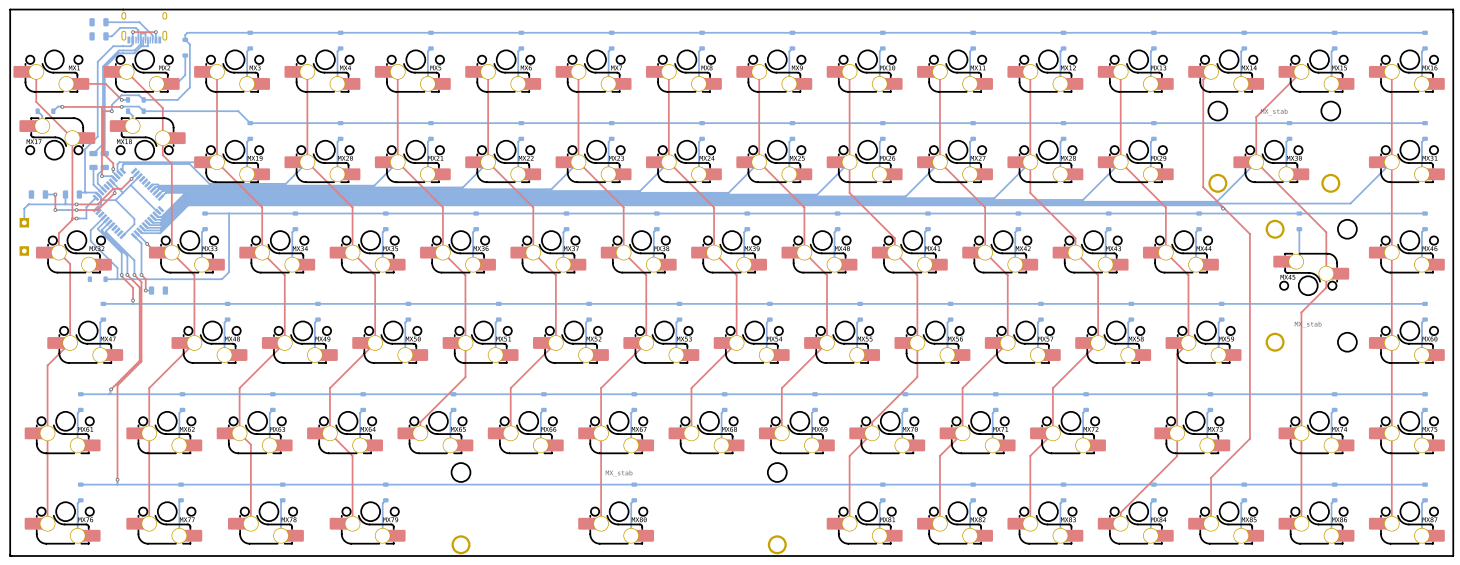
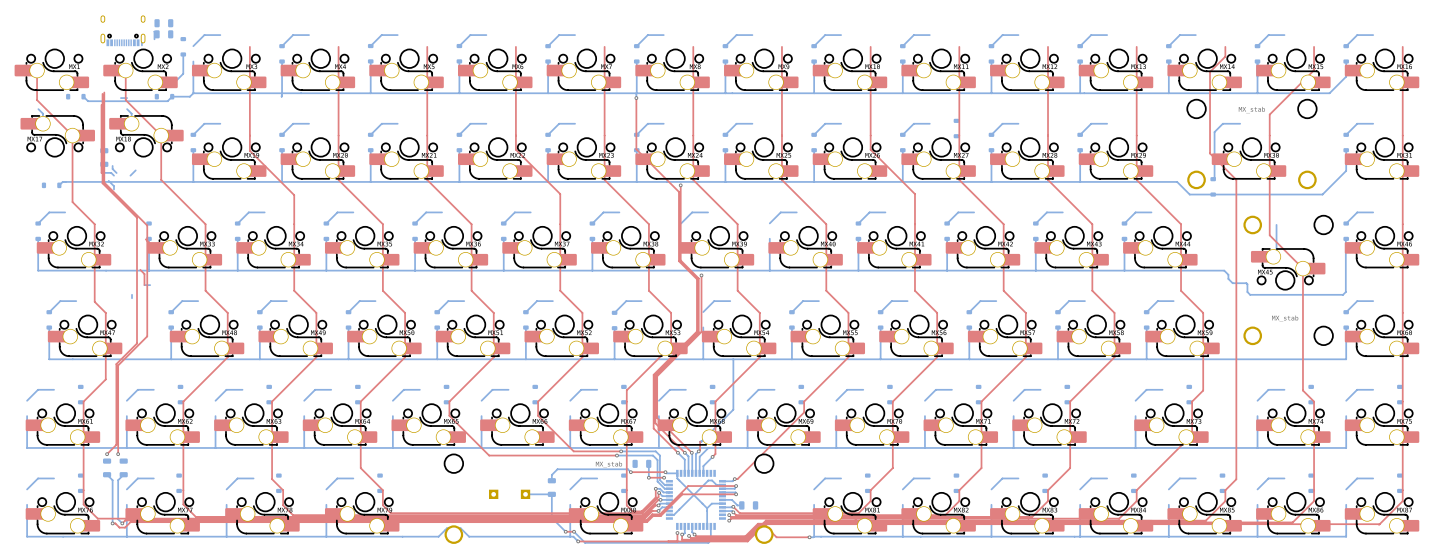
board edge: (10, 9) (1453, 9) (1453, 555) (10, 555) (10, 9) -> none
part: (99, 22) -> none
bottom track: (105, 22) (139, 22) (152, 35) (152, 40) -> none
part: none -> (163, 23)
part: (144, 27) -> none
part: none -> (122, 30)
bottom track: (132, 32) (132, 44) (130, 46) (113, 46) (97, 61) (97, 136) (85, 149) (85, 192) -> none
top track: (133, 32) (155, 32) -> none
via: (133, 32) -> none
via: (155, 32) -> none
bottom track: (1425, 32) (187, 32) (185, 39) (189, 44) (189, 87) (177, 99) (143, 99) (139, 95) (121, 95) (111, 104) (111, 111) -> none
part: none -> (163, 34)
bottom track: none -> (220, 35) (204, 35) (193, 46)
bottom track: none -> (309, 35) (293, 35) (282, 46)
bottom track: none -> (397, 35) (381, 35) (370, 46)
bottom track: none -> (486, 35) (470, 35) (459, 46)
bottom track: none -> (575, 35) (559, 35) (548, 46)
bottom track: none -> (663, 35) (647, 35) (636, 46)
bottom track: none -> (752, 35) (736, 35) (725, 46)
bottom track: none -> (841, 35) (825, 35) (814, 46)
bottom track: none -> (929, 35) (913, 35) (902, 46)
bottom track: none -> (1018, 35) (1002, 35) (991, 46)
bottom track: none -> (1107, 35) (1091, 35) (1080, 46)
bottom track: none -> (1195, 35) (1179, 35) (1168, 46)
bottom track: none -> (1284, 35) (1268, 35) (1257, 46)
bottom track: none -> (1373, 35) (1357, 35) (1346, 46)
part: (99, 36) -> none
bottom track: (105, 36) (111, 36) (120, 27) (135, 27) (138, 30) (138, 40) -> none
bottom track: (145, 40) (145, 33) (140, 33) (140, 44) (134, 50) (119, 50) (103, 66) (103, 144) (93, 153) -> none
bottom track: (147, 40) (147, 46) (141, 46) (134, 53) (118, 53) (104, 67) (104, 153) -> none
part: (250, 40) -> none
part: (340, 40) -> none
part: (430, 40) -> none
part: (521, 40) -> none
part: (611, 40) -> none
part: (702, 40) -> none
part: (792, 40) -> none
part: (882, 40) -> none
part: (973, 40) -> none
part: (1063, 40) -> none
part: (1153, 40) -> none
part: (1244, 40) -> none
part: (1334, 40) -> none
part: (1425, 40) -> none
top track: none -> (249, 46) (249, 150) (294, 195) (294, 290) (316, 312) (316, 357) (272, 401) (272, 479) (283, 490) (283, 505) (292, 515) (643, 515) (660, 499)
top track: none -> (338, 46) (338, 179) (382, 224) (382, 290) (405, 312) (405, 357) (360, 401) (360, 468) (382, 490) (382, 505) (390, 513) (642, 513) (658, 497) (659, 492)
top track: none -> (427, 46) (427, 179) (471, 224) (471, 290) (493, 312) (493, 357) (449, 401) (449, 415) (489, 455) (616, 455)
top track: none -> (515, 46) (515, 149) (560, 194) (560, 290) (582, 312) (582, 357) (538, 401) (538, 415) (573, 451) (621, 451)
top track: none -> (604, 46) (604, 179) (648, 224) (648, 290) (671, 312) (671, 345) (626, 390) (626, 505) (632, 511) (641, 511) (655, 497) (655, 488)
top track: none -> (693, 46) (693, 179) (737, 224) (737, 290) (759, 312) (759, 357) (715, 401) (715, 454) (712, 456)
top track: none -> (781, 46) (781, 179) (826, 224) (826, 290) (848, 312) (848, 357) (804, 401) (804, 412) (737, 479) (734, 479)
top track: none -> (870, 46) (870, 149) (914, 194) (914, 290) (937, 312) (937, 357) (892, 401) (892, 468) (870, 490) (870, 501) (858, 513) (739, 513) (733, 506)
top track: none -> (959, 46) (959, 179) (1003, 224) (1003, 290) (1025, 312) (1025, 357) (981, 401) (981, 468) (959, 490) (959, 501) (945, 515) (736, 515) (733, 512)
top track: none -> (1048, 46) (1048, 179) (1092, 224) (1092, 290) (1114, 312) (1114, 357) (1070, 401) (1070, 468) (1048, 490) (1048, 501) (1032, 516) (730, 516) (729, 515)
top track: none -> (1136, 46) (1136, 179) (1181, 224) (1181, 290) (1203, 312) (1203, 390) (1192, 401) (1192, 434) (1136, 490) (1136, 501) (1119, 518) (731, 518) (729, 520)
top track: none -> (1225, 46) (1225, 56) (1210, 71) (1210, 153) (1236, 179) (1236, 479) (1225, 490) (1225, 501) (1205, 520) (765, 520) (762, 523) (757, 523) (745, 536) (696, 536) (694, 534)
top track: none -> (1402, 46) (1402, 501) (1379, 524)
bottom track: (250, 48) (247, 51) (247, 83) (250, 80) -> none
bottom track: (340, 48) (337, 51) (337, 83) (340, 80) -> none
bottom track: (430, 48) (427, 51) (427, 83) -> none
bottom track: (521, 48) (518, 51) (518, 83) (521, 80) -> none
bottom track: (611, 48) (608, 51) (608, 83) (611, 80) -> none
bottom track: (702, 48) (698, 51) (698, 83) (702, 80) -> none
bottom track: (792, 48) (789, 51) (789, 83) (792, 80) -> none
bottom track: (882, 48) (879, 51) (879, 83) (882, 80) -> none
bottom track: (973, 48) (970, 51) (970, 83) (973, 80) -> none
bottom track: (1063, 48) (1060, 51) (1060, 83) (1063, 80) -> none
bottom track: (1153, 48) (1150, 51) (1150, 83) (1153, 80) -> none
bottom track: (1244, 48) (1241, 51) (1241, 83) (1244, 80) -> none
bottom track: (1334, 48) (1331, 51) (1331, 83) (1334, 80) -> none
bottom track: (1425, 48) (1421, 51) (1421, 83) -> none
part: none -> (282, 53)
part: none -> (370, 53)
part: none -> (459, 53)
part: none -> (548, 53)
part: none -> (636, 53)
part: none -> (725, 53)
part: none -> (814, 53)
part: none -> (902, 53)
part: none -> (991, 53)
part: none -> (1080, 53)
part: none -> (1168, 53)
part: none -> (1257, 53)
part: none -> (1346, 53)
bottom track: none -> (193, 61) (193, 93)
bottom track: none -> (282, 61) (282, 96)
bottom track: none -> (370, 61) (370, 93)
bottom track: none -> (459, 61) (459, 93)
bottom track: none -> (548, 61) (548, 93)
bottom track: none -> (636, 61) (636, 98)
bottom track: none -> (725, 61) (725, 93)
bottom track: none -> (814, 61) (814, 93)
bottom track: none -> (902, 61) (902, 93)
bottom track: none -> (991, 61) (991, 93)
bottom track: none -> (1080, 61) (1080, 93)
bottom track: none -> (1168, 61) (1168, 93)
bottom track: none -> (1257, 61) (1257, 93)
bottom track: none -> (1346, 61) (1346, 76) (1329, 93) (193, 93)
top track: (126, 71) (162, 108) (162, 138) -> (125, 70) (125, 100) (161, 135)
top track: (217, 71) (217, 162) (262, 207) (262, 252) (284, 275) (284, 342) (239, 388) (239, 433) (250, 444) (250, 523) -> none
top track: (307, 71) (307, 162) (352, 207) (352, 252) (375, 275) (375, 342) (329, 388) (329, 433) (352, 455) (352, 523) -> none
top track: (397, 71) (397, 162) (442, 207) (442, 252) (465, 275) (465, 377) (420, 422) (420, 433) -> none
top track: (488, 71) (488, 162) (533, 207) (533, 252) (555, 275) (555, 342) (510, 388) (510, 433) -> none
top track: (578, 71) (578, 162) (623, 207) (623, 252) (646, 275) (646, 342) (601, 388) (601, 523) -> none
top track: (668, 71) (668, 162) (714, 207) (714, 252) (736, 275) (736, 342) (691, 388) (691, 433) -> none
top track: (759, 71) (759, 162) (804, 207) (804, 252) (827, 275) (827, 342) (781, 388) (781, 433) -> none
top track: (849, 71) (849, 192) (894, 238) (894, 252) (917, 275) (917, 377) (872, 422) (872, 433) (849, 455) (849, 523) -> none
top track: (939, 71) (939, 162) (985, 207) (985, 252) (1007, 275) (1007, 342) (962, 388) (962, 433) (939, 455) (939, 523) -> none
top track: (1030, 71) (1030, 192) (1075, 238) (1075, 252) (1098, 275) (1098, 342) (1052, 388) (1052, 433) (1030, 455) (1030, 523) -> none
top track: (1120, 71) (1120, 162) (1165, 207) (1165, 252) (1188, 275) (1188, 342) (1177, 354) (1177, 456) (1120, 512) (1120, 523) -> none
top track: (1211, 71) (1203, 79) (1203, 187) (1249, 234) (1249, 438) (1211, 477) (1211, 523) -> none
top track: (1301, 71) (1256, 117) (1256, 162) (1326, 232) (1326, 273) -> (1314, 46) (1314, 70) (1269, 114) (1269, 235) (1302, 268)
top track: (1391, 71) (1391, 523) -> none
top track: (66, 83) (105, 83) (121, 99) -> none
top track: none -> (104, 92) (104, 182) (147, 225) (147, 336) (118, 365) (118, 454)
top track: none -> (102, 93) (102, 183) (137, 217) (137, 343) (116, 364) (116, 444) (107, 454)
bottom track: none -> (193, 93) (189, 96) (172, 96) (167, 101) (88, 101) (83, 96)
part: none -> (75, 96)
part: none -> (164, 96)
via: (121, 99) -> none
part: (135, 99) -> none
top track: none -> (636, 98) (636, 149) (678, 191) (678, 261) (696, 279) (696, 331) (653, 374) (653, 428) (677, 452)
via: none -> (636, 98)
bottom track: (60, 106) (62, 106) (57, 106) (53, 111) -> none
top track: (62, 106) (121, 106) -> none
via: (62, 106) -> none
via: (121, 106) -> none
bottom track: (123, 106) (139, 106) (143, 111) (238, 111) (250, 123) (1425, 123) -> none
part: (45, 111) -> none
top track: (111, 111) (103, 111) (103, 153) (113, 163) (113, 169) -> none
via: (111, 111) -> none
part: (135, 111) -> none
bottom track: none -> (220, 123) (204, 123) (193, 134)
bottom track: none -> (309, 123) (293, 123) (282, 134)
bottom track: none -> (397, 123) (381, 123) (370, 134)
bottom track: none -> (486, 123) (470, 123) (459, 134)
bottom track: none -> (575, 123) (559, 123) (548, 134)
bottom track: none -> (663, 123) (647, 123) (636, 134)
bottom track: none -> (752, 123) (736, 123) (725, 134)
bottom track: none -> (841, 123) (825, 123) (814, 134)
bottom track: none -> (929, 123) (913, 123) (902, 134)
bottom track: none -> (1018, 123) (1002, 123) (991, 134)
bottom track: none -> (1107, 123) (1091, 123) (1080, 134)
bottom track: none -> (1240, 123) (1222, 123) (1214, 132) (1213, 179)
bottom track: none -> (1373, 123) (1357, 123) (1346, 134)
part: (250, 130) -> none
part: (340, 130) -> none
part: (430, 130) -> none
part: (521, 130) -> none
part: (611, 130) -> none
part: (702, 130) -> none
part: (792, 130) -> none
part: (882, 130) -> none
part: (1063, 130) -> none
part: (1153, 130) -> none
part: (1289, 130) -> none
part: (1425, 130) -> none
bottom track: (250, 138) (247, 141) (247, 174) (250, 171) -> none
bottom track: (340, 138) (337, 141) (337, 174) (340, 171) -> none
bottom track: (430, 138) (427, 141) (427, 174) (430, 171) -> none
bottom track: (521, 138) (518, 141) (518, 174) (521, 171) -> none
bottom track: (611, 138) (608, 141) (608, 174) (611, 171) -> none
bottom track: (702, 138) (698, 141) (698, 174) (702, 171) -> none
bottom track: (792, 138) (789, 141) (789, 174) (792, 171) -> none
bottom track: (882, 138) (879, 141) (879, 174) (882, 171) -> none
bottom track: (973, 138) (970, 141) (970, 174) (973, 171) -> none
bottom track: (1063, 138) (1060, 141) (1060, 174) (1063, 171) -> none
bottom track: (1153, 138) (1150, 141) (1150, 174) (1153, 171) -> none
bottom track: (1289, 138) (1286, 141) (1286, 174) -> none
bottom track: (1425, 138) (1421, 141) (1421, 174) (1425, 171) -> none
part: none -> (193, 142)
part: none -> (282, 142)
part: none -> (370, 142)
part: none -> (459, 142)
part: none -> (548, 142)
part: none -> (636, 142)
part: none -> (725, 142)
part: none -> (814, 142)
part: none -> (902, 142)
part: none -> (991, 142)
part: none -> (1080, 142)
part: none -> (1346, 142)
bottom track: none -> (193, 150) (193, 181)
bottom track: none -> (282, 150) (282, 181)
bottom track: none -> (370, 150) (370, 181)
bottom track: none -> (459, 150) (459, 181)
bottom track: none -> (548, 150) (548, 181)
bottom track: none -> (636, 150) (636, 181)
bottom track: none -> (725, 150) (725, 181)
bottom track: none -> (814, 150) (814, 181)
bottom track: none -> (902, 150) (902, 181)
bottom track: none -> (991, 150) (991, 181)
bottom track: none -> (1080, 150) (1080, 181)
bottom track: none -> (1346, 150) (1346, 170) (1322, 194) (1189, 194) (1177, 181) (62, 181) (59, 185)
top track: (162, 155) (171, 164) (171, 252) (194, 275) (194, 342) (149, 388) (149, 523) -> (161, 152) (161, 179) (205, 224) (205, 290) (227, 312) (227, 357) (183, 401) (183, 504) (195, 516) (644, 516) (655, 505) (658, 505)
part: (93, 160) -> none
bottom track: (217, 162) (119, 162) (117, 171) (120, 173) -> none
bottom track: (307, 162) (285, 183) (209, 183) (189, 164) (123, 164) (122, 170) -> none
bottom track: (397, 162) (374, 185) (152, 184) (150, 187) -> none
bottom track: (488, 162) (462, 187) (155, 187) (152, 189) -> none
bottom track: (578, 162) (551, 189) (158, 189) (155, 192) -> none
bottom track: (668, 162) (640, 191) (162, 191) (158, 195) -> none
bottom track: (759, 162) (728, 192) (165, 192) (160, 197) -> none
bottom track: (849, 162) (817, 194) (183, 194) (161, 217) (155, 214) -> none
bottom track: (939, 162) (905, 196) (184, 196) (161, 219) (155, 219) (152, 217) -> none
bottom track: (1030, 162) (994, 198) (185, 198) (160, 222) (153, 222) (150, 219) -> none
bottom track: (1120, 162) (1082, 199) (185, 199) (160, 225) (150, 225) (147, 222) -> none
bottom track: (1256, 162) (1216, 201) (186, 201) (160, 227) (147, 227) (144, 225) -> none
bottom track: (1391, 162) (1350, 203) (187, 203) (160, 230) (144, 230) (142, 227) -> none
bottom track: (93, 167) (93, 184) (101, 192) -> none
bottom track: (104, 167) (97, 174) (97, 183) (103, 189) -> none
via: (113, 169) -> none
via: (101, 176) -> none
bottom track: (139, 176) (115, 200) -> none
top track: (131, 178) (121, 188) (113, 188) (97, 204) (76, 204) -> none
via: (131, 178) -> none
bottom track: (111, 181) (122, 192) -> none
bottom track: (130, 185) (158, 211) -> none
part: none -> (51, 185)
top track: none -> (680, 185) (680, 260) (698, 278) (698, 332) (655, 375) (655, 423) (684, 452)
via: none -> (680, 185)
part: none -> (1213, 186)
top track: (114, 193) (97, 210) (76, 210) -> none
via: (114, 193) -> none
part: (38, 194) -> none
bottom track: (45, 194) (55, 194) -> none
top track: (55, 194) (55, 210) -> none
via: (55, 194) -> none
bottom track: (65, 194) (65, 204) -> none
part: (72, 194) -> none
bottom track: (79, 194) (81, 192) (96, 192) (101, 197) (101, 203) (95, 209) -> none
bottom track: (95, 197) (86, 207) (86, 218) (76, 218) -> none
bottom track: (101, 200) (115, 200) -> none
bottom track: (115, 200) (134, 218) (134, 224) (122, 236) -> none
part: (128, 203) -> none
bottom track: (28, 204) (24, 208) (24, 222) -> none
bottom track: (28, 204) (76, 204) -> none
via: (76, 204) -> none
top track: (72, 205) (72, 219) (58, 233) (58, 252) (70, 263) (70, 342) (47, 365) (47, 523) -> (72, 202) (94, 224) (94, 301) (105, 312) (105, 379) (83, 401) (83, 504) (97, 518) (644, 518) (652, 510) (658, 510)
bottom track: (1223, 208) (1219, 205) (188, 205) (160, 233) (142, 233) (139, 230) -> none
via: (1223, 208) -> none
bottom track: (55, 210) (76, 210) -> none
via: (55, 210) -> none
via: (76, 210) -> none
bottom track: (205, 213) (1425, 213) -> none
bottom track: (229, 213) (229, 272) (221, 279) (105, 279) -> none
bottom track: none -> (65, 212) (49, 212) (38, 223)
bottom track: none -> (264, 212) (248, 212) (237, 223)
bottom track: none -> (353, 212) (337, 212) (326, 223)
bottom track: none -> (442, 212) (426, 212) (415, 223)
bottom track: none -> (530, 212) (514, 212) (503, 223)
bottom track: none -> (619, 212) (603, 212) (592, 223)
bottom track: none -> (708, 212) (692, 212) (681, 223)
bottom track: none -> (796, 212) (780, 212) (769, 223)
bottom track: none -> (885, 212) (869, 212) (858, 223)
bottom track: none -> (974, 212) (958, 212) (947, 223)
bottom track: none -> (1062, 212) (1046, 212) (1035, 223)
bottom track: none -> (1151, 212) (1135, 212) (1124, 223)
bottom track: none -> (1373, 212) (1357, 212) (1346, 223)
bottom track: (103, 217) (90, 230) (90, 241) (117, 267) (117, 279) -> none
top track: (72, 218) (76, 218) -> none
via: (76, 218) -> none
bottom track: (106, 219) (97, 228) -> none
part: (205, 221) -> none
part: (295, 221) -> none
part: (385, 221) -> none
part: (476, 221) -> none
part: (566, 221) -> none
part: (656, 221) -> none
part: (747, 221) -> none
part: (837, 221) -> none
part: (928, 221) -> none
part: (1018, 221) -> none
part: (1108, 221) -> none
part: (1199, 221) -> none
part: (1299, 221) -> none
part: (1425, 221) -> none
part: (24, 222) -> none
bottom track: (109, 222) (101, 230) (127, 255) (127, 275) -> none
bottom track: (111, 225) (106, 232) (134, 260) (134, 275) -> none
bottom track: (97, 228) (121, 252) (121, 275) -> none
bottom track: (205, 229) (201, 232) (201, 264) -> none
bottom track: (295, 229) (292, 232) (292, 264) -> none
bottom track: (385, 229) (382, 232) (382, 264) -> none
bottom track: (476, 229) (473, 232) (473, 264) -> none
bottom track: (566, 229) (563, 232) (563, 264) -> none
bottom track: (656, 229) (653, 232) (653, 264) -> none
bottom track: (747, 229) (744, 232) (744, 264) -> none
bottom track: (837, 229) (834, 232) (834, 264) -> none
bottom track: (928, 229) (924, 232) (924, 264) -> none
bottom track: (1018, 229) (1015, 232) (1015, 264) -> none
bottom track: (1108, 229) (1105, 232) (1105, 264) -> none
bottom track: (1199, 229) (1196, 232) (1196, 264) -> none
bottom track: (1425, 229) (1421, 232) (1421, 264) -> none
bottom track: (136, 233) (147, 243) -> none
part: none -> (38, 231)
part: none -> (149, 231)
part: none -> (237, 231)
part: none -> (326, 231)
part: none -> (415, 231)
part: none -> (503, 231)
part: none -> (592, 231)
part: none -> (858, 231)
part: none -> (947, 231)
part: none -> (1035, 231)
part: none -> (1124, 231)
part: none -> (1346, 231)
bottom track: (134, 236) (141, 243) (141, 275) -> none
bottom track: none -> (38, 238) (38, 270) (1224, 270) (1232, 283) (1246, 283) (1247, 292) (1250, 294) (1343, 294) (1345, 292) (1346, 238)
via: (147, 243) -> none
bottom track: none -> (149, 238) (149, 270)
bottom track: none -> (237, 238) (237, 270)
bottom track: none -> (326, 238) (326, 270)
bottom track: none -> (415, 238) (415, 270)
bottom track: none -> (503, 238) (503, 270)
bottom track: none -> (592, 238) (592, 270)
bottom track: none -> (769, 238) (769, 270)
bottom track: none -> (858, 238) (858, 270)
bottom track: none -> (947, 238) (947, 270)
bottom track: none -> (1035, 238) (1035, 270)
bottom track: none -> (1124, 238) (1124, 270)
part: (24, 250) -> none
top track: (121, 275) (133, 287) (133, 300) -> none
via: (121, 275) -> none
top track: (127, 275) (139, 287) (139, 360) (111, 389) -> none
via: (127, 275) -> none
top track: (134, 275) (141, 282) (141, 361) (117, 385) (117, 479) -> none
via: (134, 275) -> none
via: (141, 275) -> none
part: (97, 279) -> none
top track: none -> (701, 275) (701, 331) (657, 376) (657, 418) (691, 452)
via: none -> (701, 275)
top track: (1326, 287) (1301, 312) (1301, 523) -> (1302, 282) (1302, 390) (1314, 401) (1314, 501) (1292, 522) (766, 522) (763, 525) (758, 525) (746, 537) (691, 537) (689, 535)
via: (145, 290) -> none
part: (158, 290) -> none
via: (133, 300) -> none
bottom track: (103, 303) (1425, 303) -> none
bottom track: none -> (76, 301) (60, 301) (49, 312)
bottom track: none -> (198, 301) (182, 301) (171, 312)
bottom track: none -> (286, 301) (270, 301) (259, 312)
bottom track: none -> (375, 301) (359, 301) (348, 312)
bottom track: none -> (464, 301) (448, 301) (437, 312)
bottom track: none -> (552, 301) (536, 301) (525, 312)
bottom track: none -> (641, 301) (626, 301) (614, 312)
bottom track: none -> (730, 301) (714, 301) (703, 312)
bottom track: none -> (818, 301) (803, 301) (791, 312)
bottom track: none -> (907, 301) (891, 301) (880, 312)
bottom track: none -> (996, 301) (980, 301) (969, 312)
bottom track: none -> (1084, 301) (1069, 301) (1057, 312)
bottom track: none -> (1173, 301) (1157, 301) (1146, 312)
bottom track: none -> (1373, 301) (1357, 301) (1346, 312)
part: (103, 311) -> none
part: (227, 311) -> none
part: (318, 311) -> none
part: (408, 311) -> none
part: (498, 311) -> none
part: (589, 311) -> none
part: (679, 311) -> none
part: (769, 311) -> none
part: (860, 311) -> none
part: (950, 311) -> none
part: (1040, 311) -> none
part: (1131, 311) -> none
part: (1221, 311) -> none
part: (1425, 311) -> none
bottom track: (103, 319) (100, 322) (100, 355) -> none
bottom track: (227, 319) (224, 322) (224, 355) -> none
bottom track: (318, 319) (314, 322) (314, 355) -> none
bottom track: (408, 319) (405, 322) (405, 355) -> none
bottom track: (498, 319) (495, 322) (495, 355) -> none
bottom track: (589, 319) (586, 322) (586, 355) -> none
bottom track: (679, 319) (676, 322) (676, 355) -> none
bottom track: (769, 319) (766, 322) (766, 355) -> none
bottom track: (860, 319) (857, 322) (857, 355) -> none
bottom track: (950, 319) (947, 322) (947, 355) -> none
bottom track: (1040, 319) (1037, 322) (1037, 355) -> none
bottom track: (1131, 319) (1128, 322) (1128, 355) -> none
bottom track: (1221, 319) (1218, 322) (1218, 355) -> none
bottom track: (1425, 319) (1421, 322) (1421, 355) -> none
part: none -> (49, 319)
part: none -> (171, 319)
part: none -> (259, 319)
part: none -> (348, 319)
part: none -> (437, 319)
part: none -> (525, 319)
part: none -> (791, 319)
part: none -> (880, 319)
part: none -> (969, 319)
part: none -> (1057, 319)
part: none -> (1146, 319)
part: none -> (1346, 319)
part: none -> (614, 320)
bottom track: none -> (49, 327) (49, 359) (1346, 359) (1346, 327)
bottom track: none -> (171, 327) (171, 359)
bottom track: none -> (259, 327) (259, 359)
bottom track: none -> (348, 327) (348, 359)
bottom track: none -> (437, 327) (437, 359)
bottom track: none -> (525, 327) (525, 359)
bottom track: none -> (703, 327) (703, 359)
bottom track: none -> (791, 327) (791, 359)
bottom track: none -> (880, 327) (880, 359)
bottom track: none -> (969, 327) (969, 359)
bottom track: none -> (1057, 327) (1057, 359)
bottom track: none -> (1146, 327) (1146, 359)
bottom track: none -> (614, 328) (614, 359)
bottom track: none -> (733, 359) (733, 409) (701, 441)
bottom track: (111, 389) (110, 394) -> none
via: (111, 389) -> none
bottom track: (80, 394) (1425, 394) -> none
bottom track: none -> (54, 389) (38, 389) (27, 400)
bottom track: none -> (153, 389) (137, 389) (126, 400)
bottom track: none -> (242, 389) (226, 389) (215, 400)
bottom track: none -> (331, 389) (315, 389) (304, 400)
bottom track: none -> (419, 389) (403, 389) (392, 400)
bottom track: none -> (508, 389) (492, 389) (481, 400)
bottom track: none -> (597, 389) (581, 389) (570, 400)
bottom track: none -> (685, 389) (669, 389) (658, 400)
bottom track: none -> (774, 389) (758, 389) (747, 400)
bottom track: none -> (863, 389) (847, 389) (836, 400)
bottom track: none -> (951, 389) (935, 389) (924, 400)
bottom track: none -> (1040, 389) (1024, 389) (1013, 400)
bottom track: none -> (1162, 389) (1146, 389) (1135, 400)
bottom track: none -> (1284, 389) (1268, 389) (1257, 400)
bottom track: none -> (1373, 389) (1357, 389) (1346, 400)
bottom track: (80, 409) (77, 413) (77, 445) -> none
bottom track: (182, 409) (179, 413) (179, 445) -> none
bottom track: (272, 409) (269, 413) (269, 445) -> none
bottom track: (363, 409) (360, 413) (360, 445) -> none
bottom track: (453, 409) (450, 413) (450, 445) -> none
bottom track: (543, 409) (540, 413) (540, 445) -> none
bottom track: (634, 409) (631, 413) (631, 445) -> none
bottom track: (724, 409) (721, 413) (721, 445) -> none
bottom track: (815, 409) (811, 413) (811, 445) -> none
bottom track: (905, 409) (902, 413) (902, 445) -> none
bottom track: (995, 409) (992, 413) (992, 445) -> none
bottom track: (1086, 409) (1083, 413) (1083, 445) -> none
bottom track: (1210, 409) (1207, 413) (1207, 445) -> none
bottom track: (1334, 409) (1331, 413) (1331, 445) -> none
bottom track: (1425, 409) (1421, 413) (1421, 445) -> none
bottom track: none -> (27, 416) (27, 447) (1346, 447) (1346, 416)
bottom track: none -> (126, 416) (126, 447)
bottom track: none -> (215, 416) (215, 447)
bottom track: none -> (304, 416) (304, 447)
bottom track: none -> (392, 416) (392, 447)
bottom track: none -> (481, 416) (481, 447)
bottom track: none -> (570, 416) (570, 447)
bottom track: none -> (658, 416) (658, 447)
bottom track: none -> (747, 416) (747, 447)
bottom track: none -> (836, 416) (836, 447)
bottom track: none -> (924, 416) (924, 447)
bottom track: none -> (1013, 416) (1013, 447)
bottom track: none -> (1135, 416) (1135, 447)
bottom track: none -> (1257, 416) (1257, 447)
top track: none -> (700, 441) (698, 451)
bottom track: none -> (708, 447) (699, 456) (699, 473)
bottom track: none -> (621, 451) (655, 451) (659, 455) (659, 480) (664, 484) (669, 484)
via: none -> (621, 451)
bottom track: none -> (698, 451) (695, 454) (695, 473)
via: none -> (698, 451)
bottom track: none -> (677, 452) (684, 459) (684, 473)
via: none -> (677, 452)
bottom track: none -> (684, 452) (688, 456) (688, 473)
via: none -> (684, 452)
bottom track: none -> (691, 452) (692, 473)
via: none -> (691, 452)
via: none -> (107, 454)
via: none -> (118, 454)
bottom track: none -> (616, 455) (653, 455) (657, 460) (657, 481) (664, 488) (669, 488)
via: none -> (616, 455)
bottom track: none -> (712, 456) (703, 466) (702, 472)
via: none -> (712, 456)
part: none -> (641, 463)
bottom track: none -> (648, 463) (648, 477)
part: none -> (107, 467)
part: none -> (123, 467)
bottom track: (117, 479) (117, 484) -> none
via: (117, 479) -> none
top track: none -> (630, 472) (665, 472)
bottom track: none -> (630, 472) (627, 469) (557, 469) (551, 474) (551, 480)
via: none -> (630, 472)
bottom track: none -> (665, 472) (677, 473) (677, 478) (707, 508)
via: none -> (665, 472)
bottom track: none -> (107, 474) (112, 480) (112, 523)
bottom track: none -> (123, 474) (118, 480) (118, 519) (122, 523)
bottom track: (80, 484) (1425, 484) -> none
top track: none -> (648, 477) (664, 477)
via: none -> (648, 477)
via: none -> (664, 477)
bottom track: none -> (54, 478) (38, 478) (27, 489)
bottom track: none -> (153, 478) (137, 478) (126, 489)
bottom track: none -> (253, 478) (237, 478) (226, 489)
bottom track: none -> (353, 478) (337, 478) (326, 489)
bottom track: none -> (597, 478) (581, 478) (570, 489)
bottom track: none -> (841, 478) (825, 478) (814, 489)
bottom track: none -> (929, 478) (913, 478) (902, 489)
bottom track: none -> (1018, 478) (1002, 478) (991, 489)
bottom track: none -> (1107, 478) (1091, 478) (1080, 489)
bottom track: none -> (1195, 478) (1179, 478) (1168, 489)
bottom track: none -> (1284, 478) (1268, 478) (1257, 489)
bottom track: none -> (1373, 478) (1357, 478) (1346, 489)
bottom track: none -> (734, 479) (732, 481) (722, 481)
via: none -> (734, 479)
bottom track: none -> (722, 484) (716, 484) (712, 480) (708, 480) (674, 514) (669, 514)
top track: none -> (736, 486) (688, 486) (659, 514) (652, 514) (646, 520) (125, 520) (122, 523)
bottom track: none -> (736, 486) (734, 488) (722, 488)
via: none -> (736, 486)
part: none -> (551, 487)
bottom track: none -> (655, 488) (668, 492)
via: none -> (655, 488)
bottom track: (80, 500) (77, 503) (77, 535) -> none
bottom track: (181, 500) (179, 501) (179, 535) -> none
bottom track: (282, 500) (281, 501) (281, 535) -> none
bottom track: (385, 500) (382, 503) (382, 535) -> none
bottom track: (634, 500) (631, 503) (631, 535) -> none
bottom track: (882, 500) (879, 503) (879, 535) -> none
bottom track: (973, 500) (970, 503) (970, 535) -> none
bottom track: (1063, 500) (1060, 503) (1060, 535) -> none
bottom track: (1153, 500) (1150, 503) (1150, 535) -> none
bottom track: (1244, 500) (1241, 503) (1241, 535) -> none
bottom track: (1334, 500) (1331, 503) (1331, 535) -> none
bottom track: (1425, 500) (1421, 503) (1421, 535) -> none
bottom track: none -> (722, 492) (736, 492)
bottom track: none -> (659, 492) (662, 496) (669, 496)
via: none -> (659, 492)
part: none -> (493, 494)
bottom track: none -> (525, 494) (551, 494) (551, 517) (565, 531)
part: none -> (525, 494)
top track: none -> (736, 494) (682, 494) (660, 516) (653, 516) (647, 522) (130, 522) (125, 527) (119, 527) (112, 523)
via: none -> (736, 494)
bottom track: none -> (660, 499) (669, 499)
via: none -> (660, 499)
part: none -> (695, 499)
bottom track: none -> (722, 499) (731, 499) (737, 505) (741, 505)
bottom track: none -> (669, 503) (658, 505)
bottom track: none -> (722, 503) (711, 503) (707, 508)
bottom track: none -> (27, 504) (27, 536) (438, 536) (446, 528) (460, 528) (469, 536) (573, 536) (578, 541)
bottom track: none -> (126, 504) (126, 536)
bottom track: none -> (226, 504) (226, 536)
bottom track: none -> (326, 504) (326, 536)
bottom track: none -> (570, 504) (570, 536)
bottom track: none -> (814, 504) (814, 536)
bottom track: none -> (902, 504) (902, 536)
bottom track: none -> (991, 504) (991, 536)
bottom track: none -> (1080, 504) (1080, 536)
bottom track: none -> (1168, 504) (1168, 536)
bottom track: none -> (1257, 504) (1257, 536)
bottom track: none -> (1346, 504) (1346, 536) (814, 536)
via: none -> (658, 505)
part: none -> (748, 505)
bottom track: none -> (669, 507) (662, 507) (658, 510)
bottom track: none -> (731, 506) (722, 507)
via: none -> (733, 506)
bottom track: none -> (707, 508) (707, 526)
via: none -> (658, 510)
bottom track: none -> (722, 511) (733, 512)
via: none -> (733, 512)
via: none -> (729, 515)
via: none -> (729, 520)
via: none -> (112, 523)
via: none -> (122, 523)
top track: none -> (1379, 524) (767, 524) (764, 527) (759, 527) (746, 539) (682, 539) (682, 534)
bottom track: none -> (684, 526) (683, 534)
bottom track: none -> (692, 526) (692, 532) (694, 534)
bottom track: none -> (710, 526) (710, 540) (708, 542) (585, 542) (574, 531)
top track: none -> (565, 531) (574, 531)
via: none -> (565, 531)
via: none -> (574, 531)
top track: none -> (677, 532) (677, 541)
via: none -> (677, 532)
via: none -> (682, 534)
via: none -> (694, 534)
via: none -> (689, 535)
bottom track: none -> (814, 536) (809, 537)
top track: none -> (809, 537) (776, 537) (768, 528) (760, 528) (747, 541) (578, 541)
via: none -> (809, 537)
via: none -> (578, 541)

